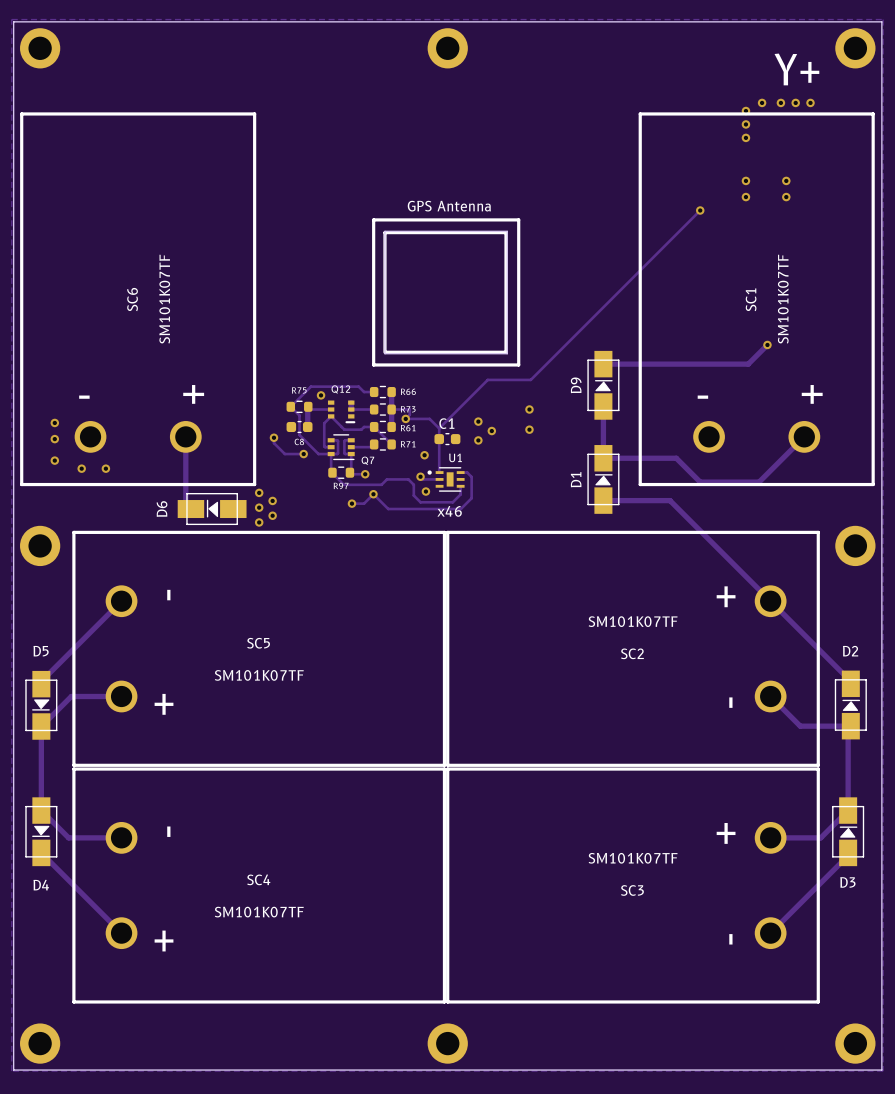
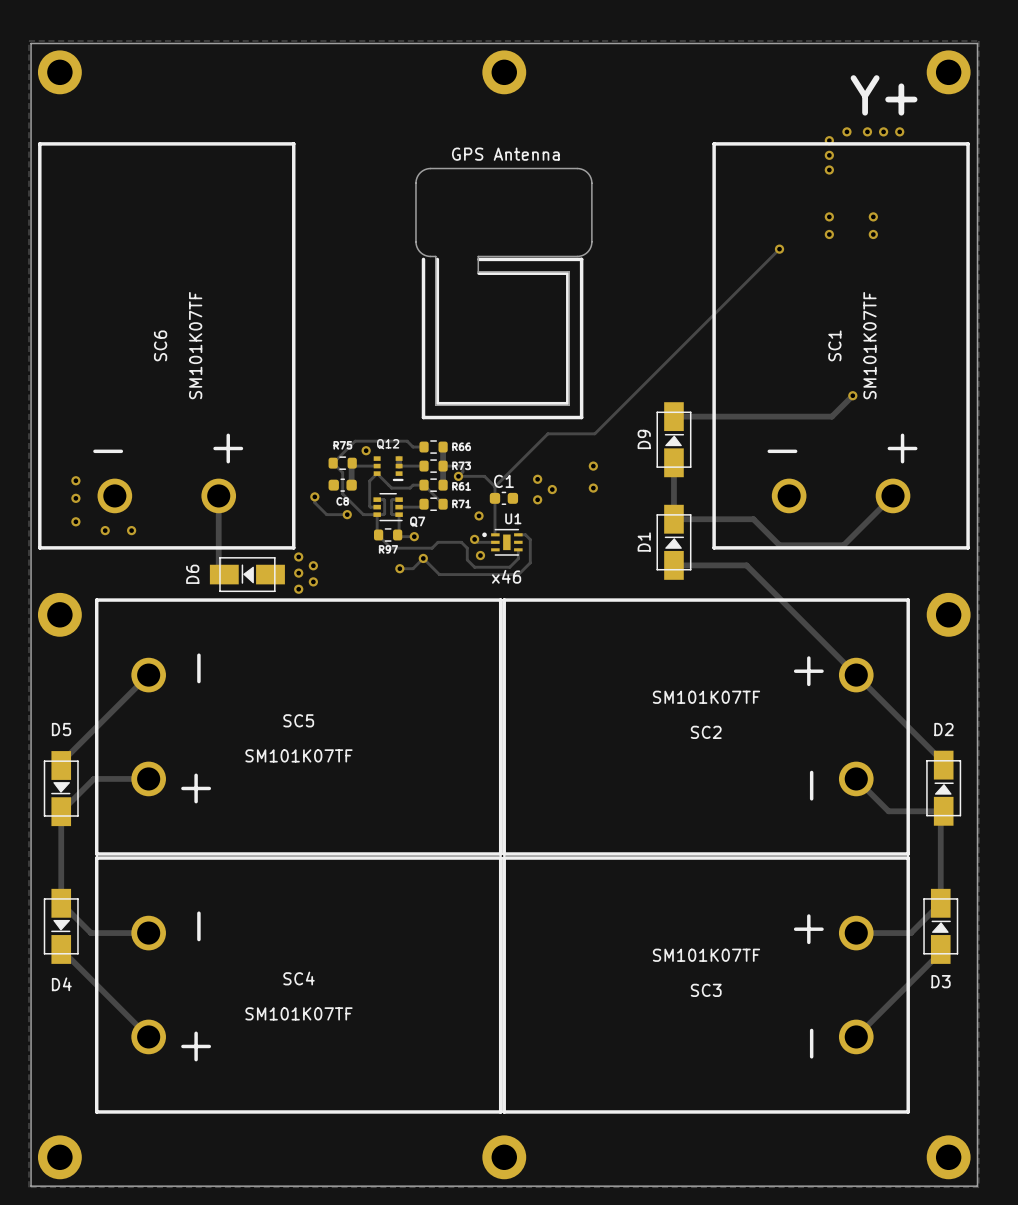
text position: GPS Antenna (449, 206) -> GPS Antenna (505, 154)
drawing shape: [372, 218, 521, 367] -> [421, 257, 584, 420]
board edge: (384, 231) (423, 231) -> (435, 271) (435, 256) (423, 254) (416, 243) (416, 181) (423, 170) (430, 168) (577, 168) (587, 172) (591, 183) (591, 241) (587, 252) (577, 256) (478, 256) (478, 271)

